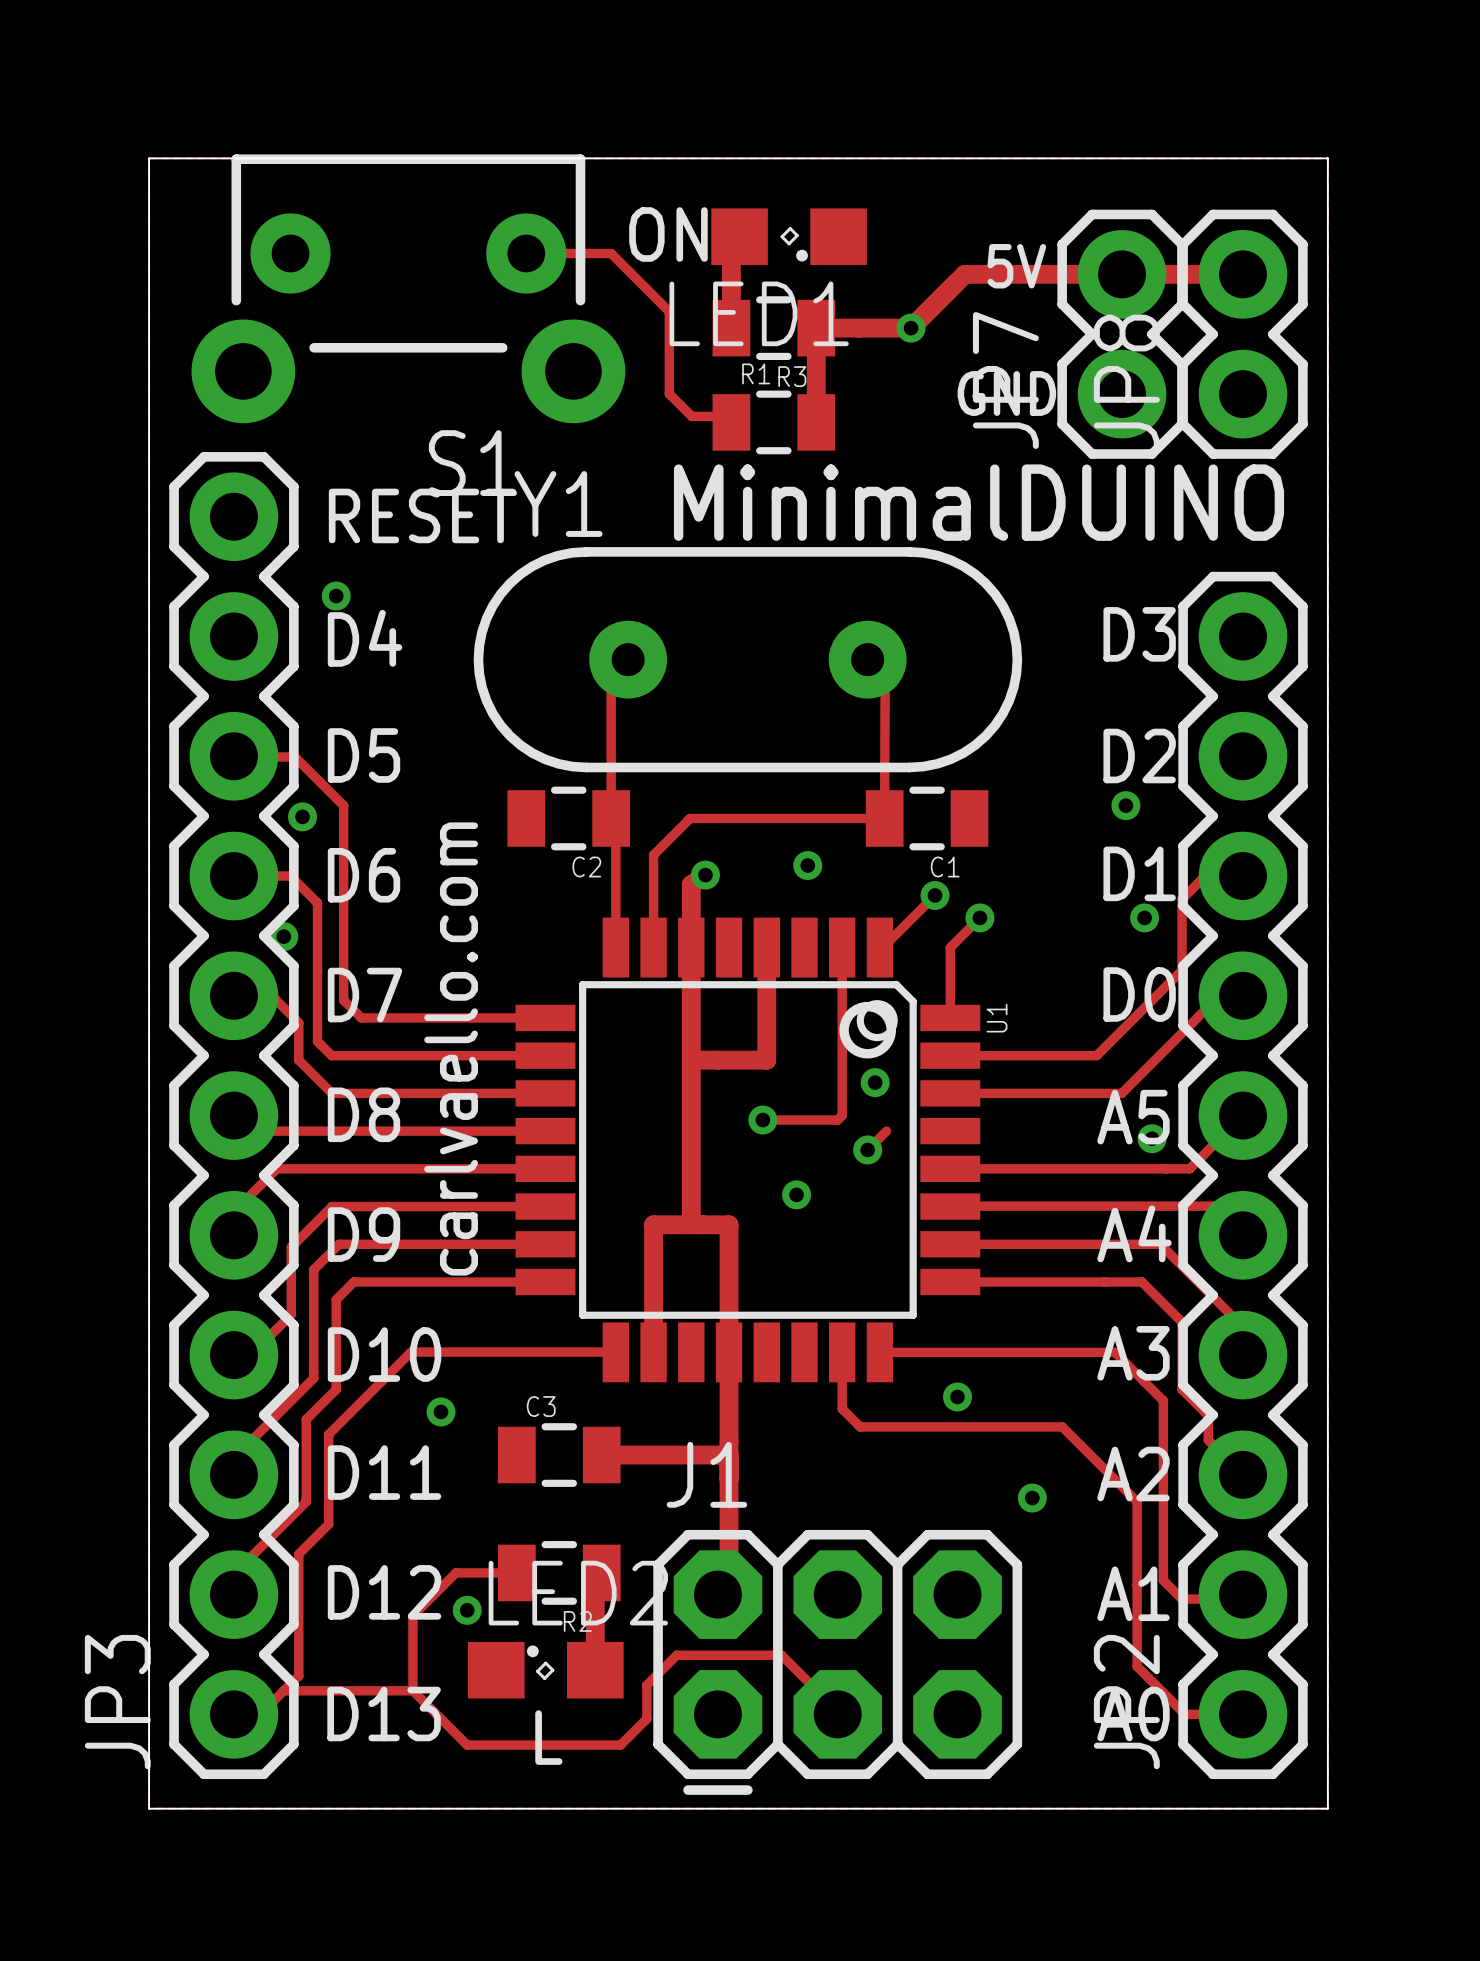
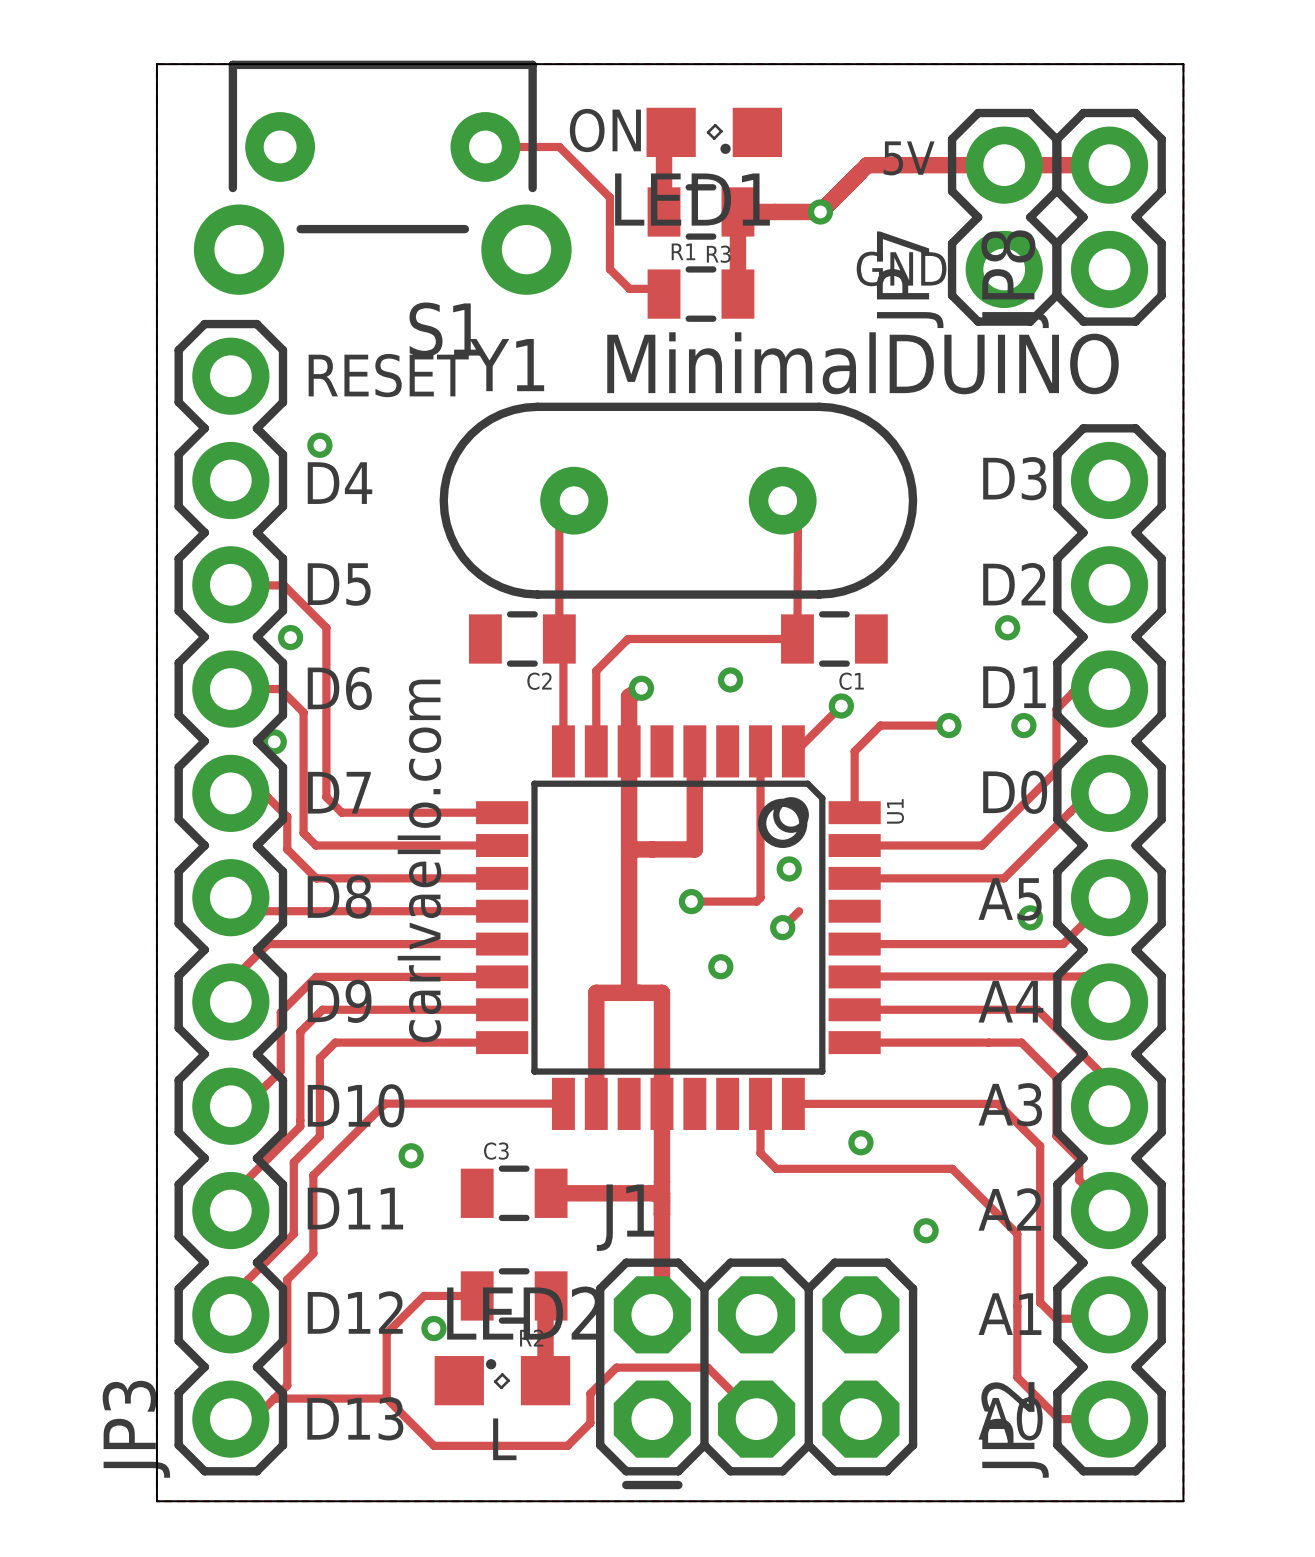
track: none -> (880, 725) (948, 725)
via position: (979, 917) -> (948, 725)

